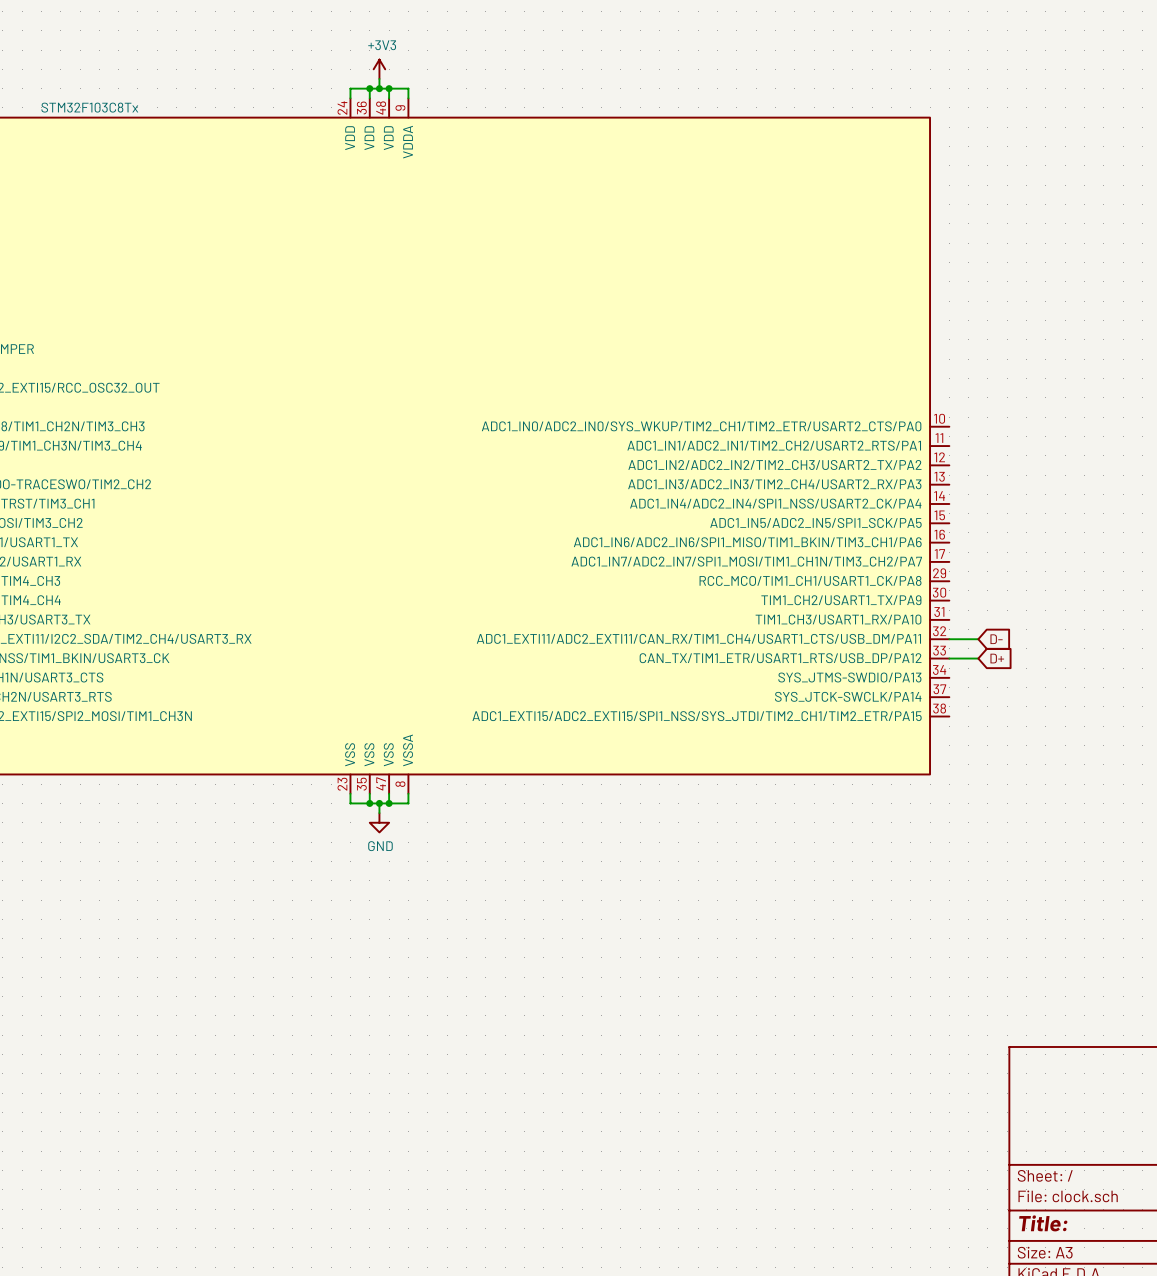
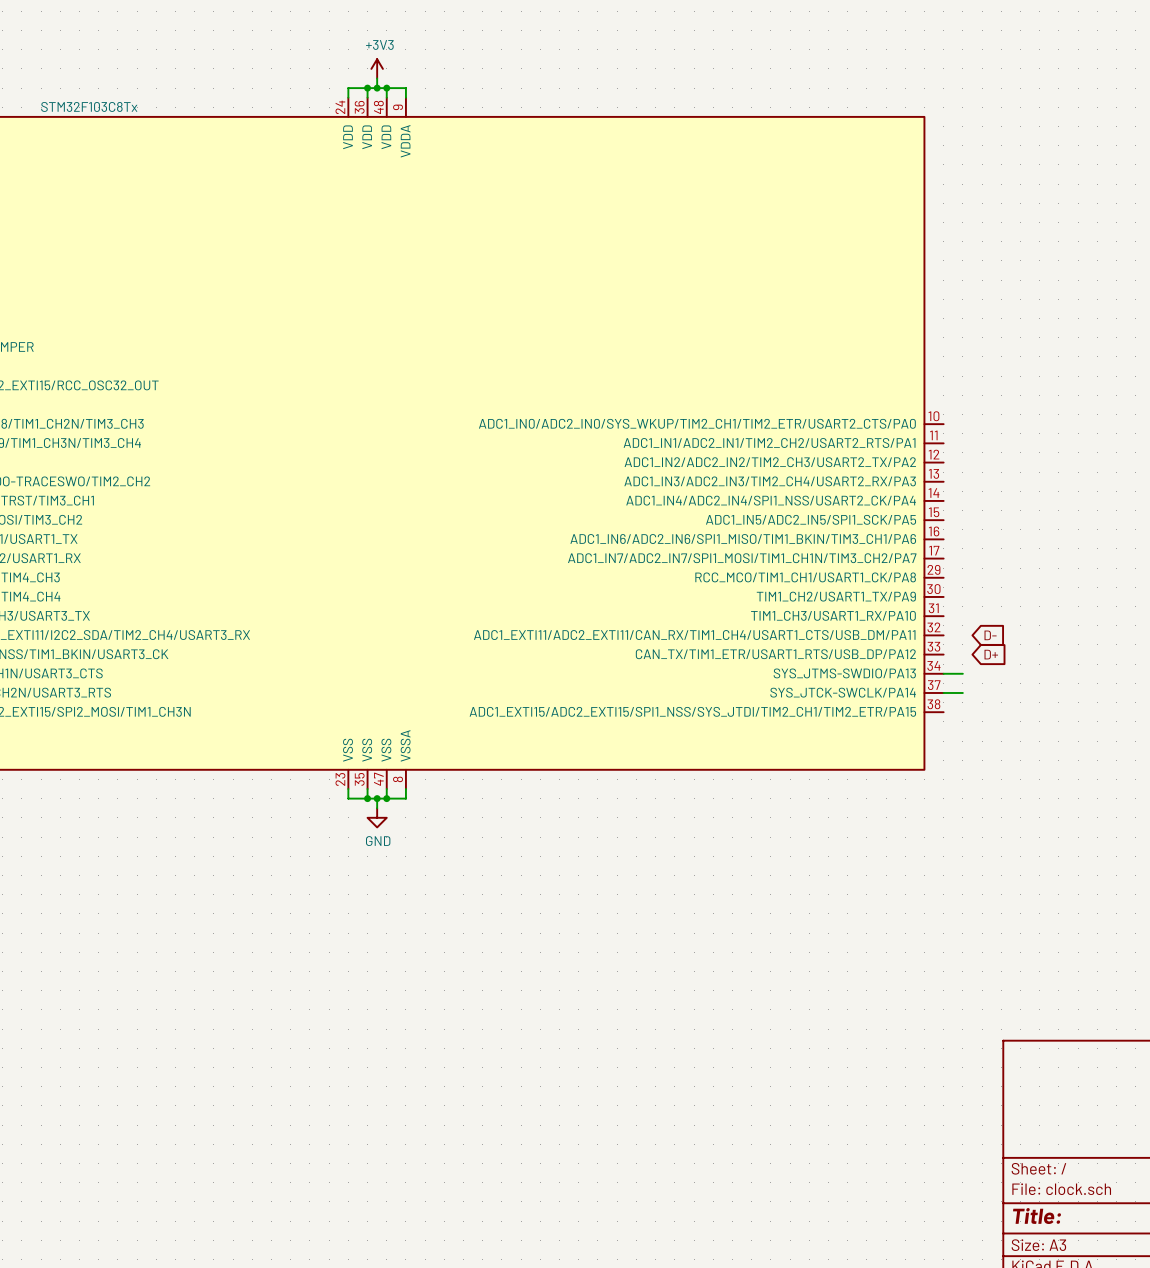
wire: (949, 639) (978, 639) -> none
wire: (949, 658) (978, 658) -> none
wire: none -> (943, 673) (962, 673)
wire: none -> (943, 692) (962, 692)

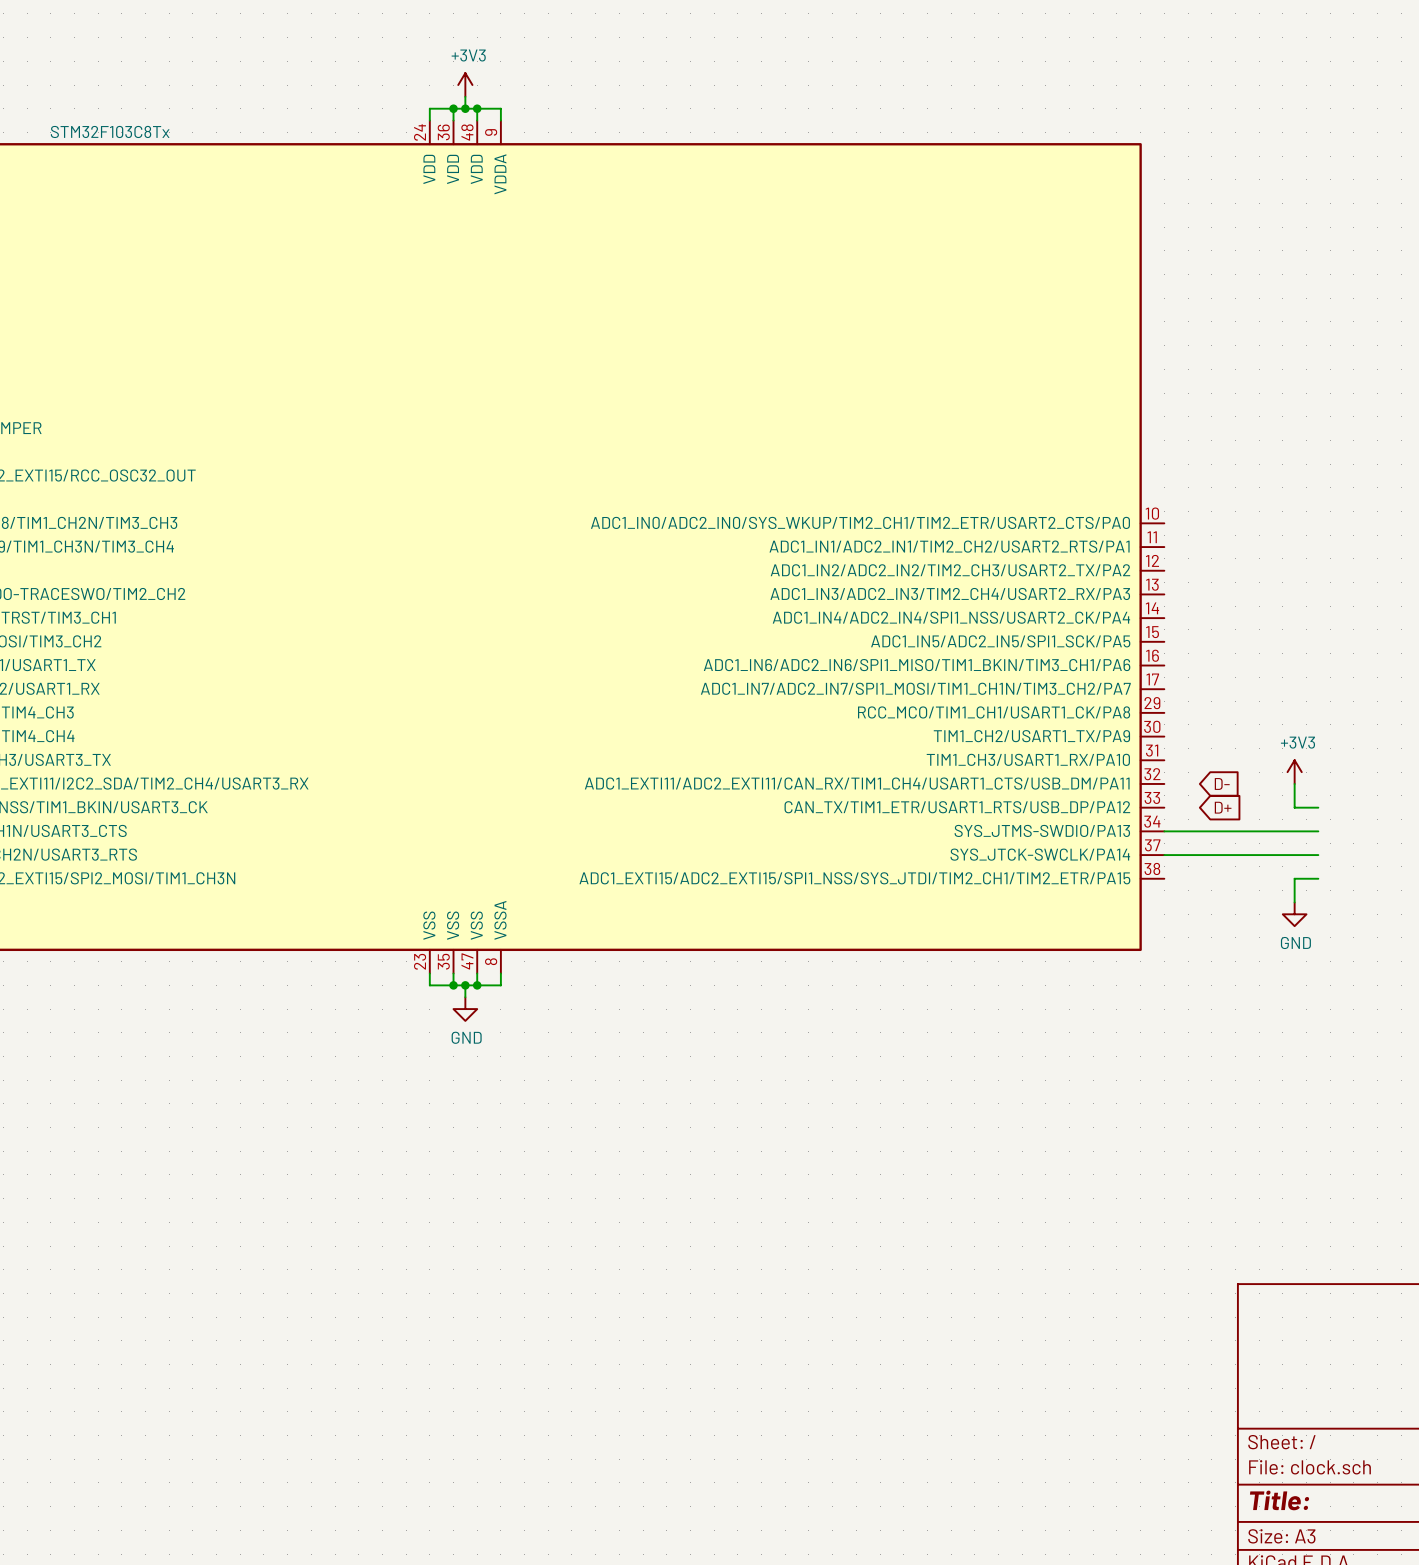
power symbol: none -> +3V3 (1294, 772)
wire: none -> (1294, 783) (1294, 807) (1318, 807)
wire: none -> (1188, 831) (1318, 831)
wire: none -> (1188, 855) (1318, 855)
wire: none -> (1318, 878) (1294, 878) (1294, 902)
power symbol: none -> GND (1294, 914)

